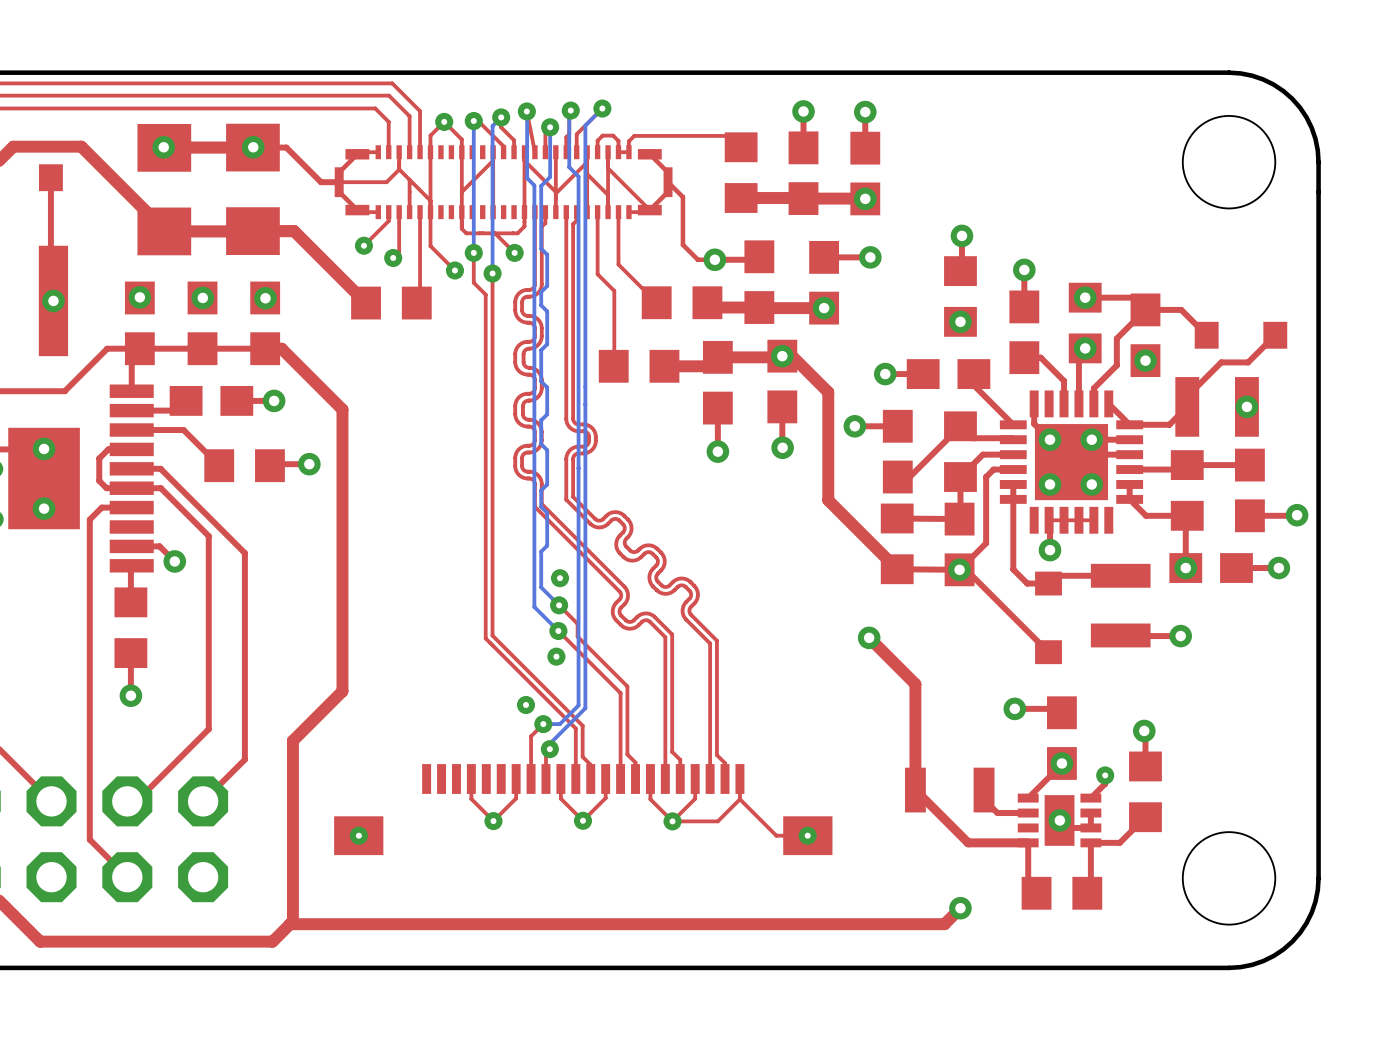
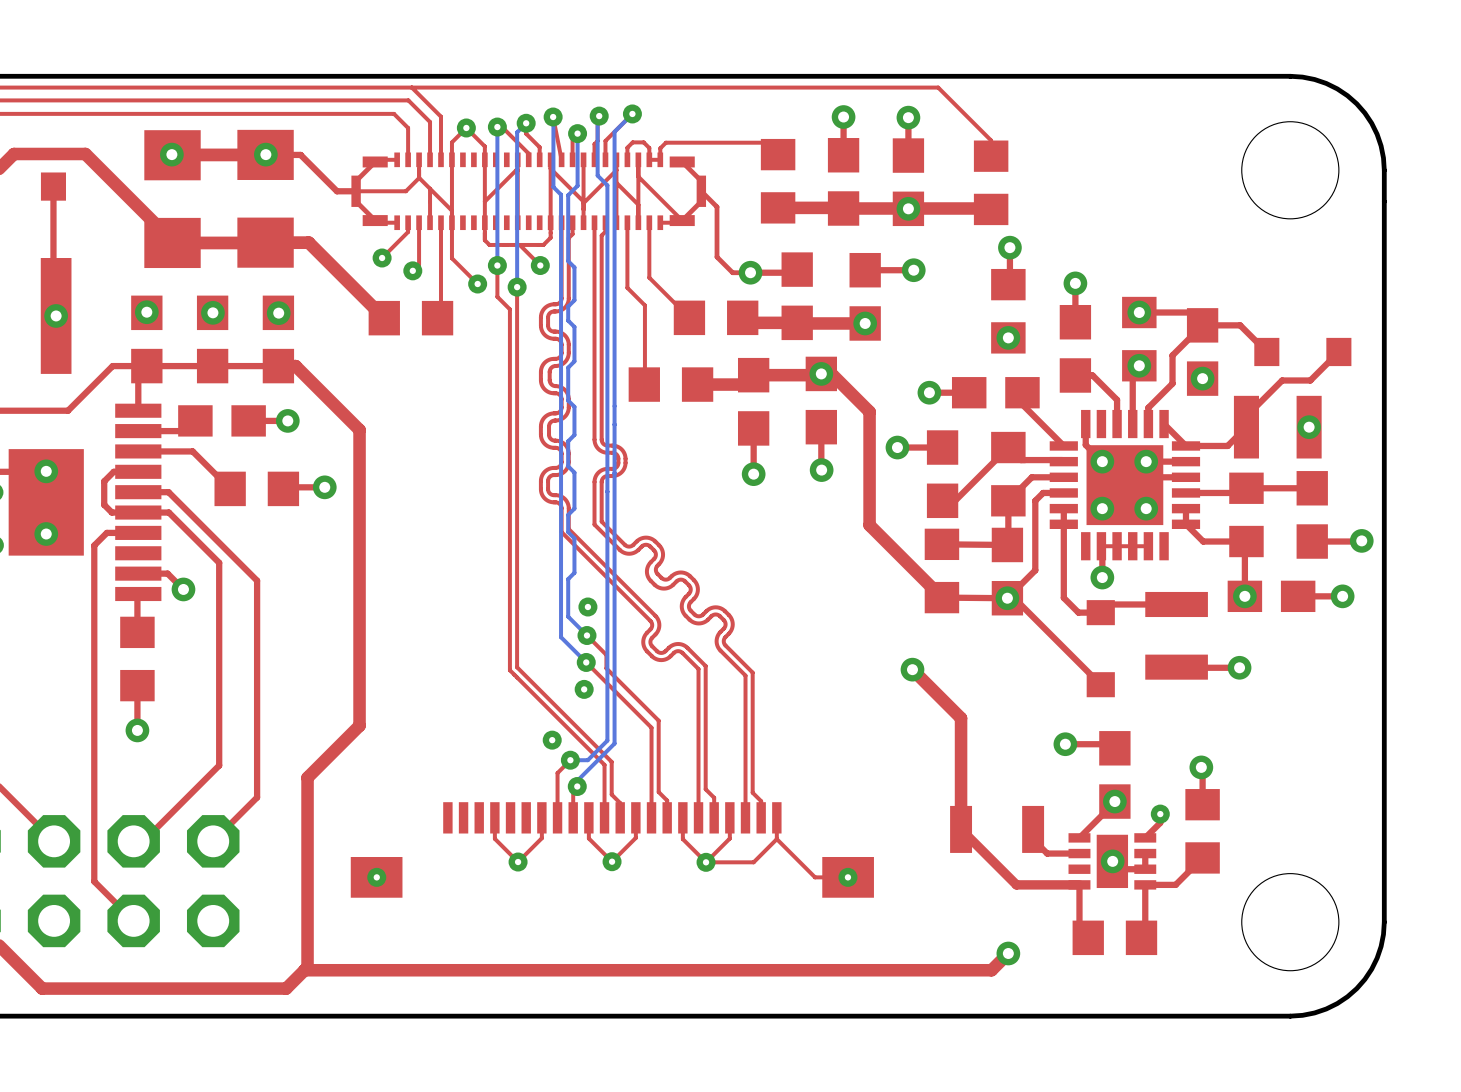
top track: none -> (411, 87) (938, 87) (991, 140) (991, 156)
part: none -> (991, 182)
top track: none -> (908, 208) (991, 209)

